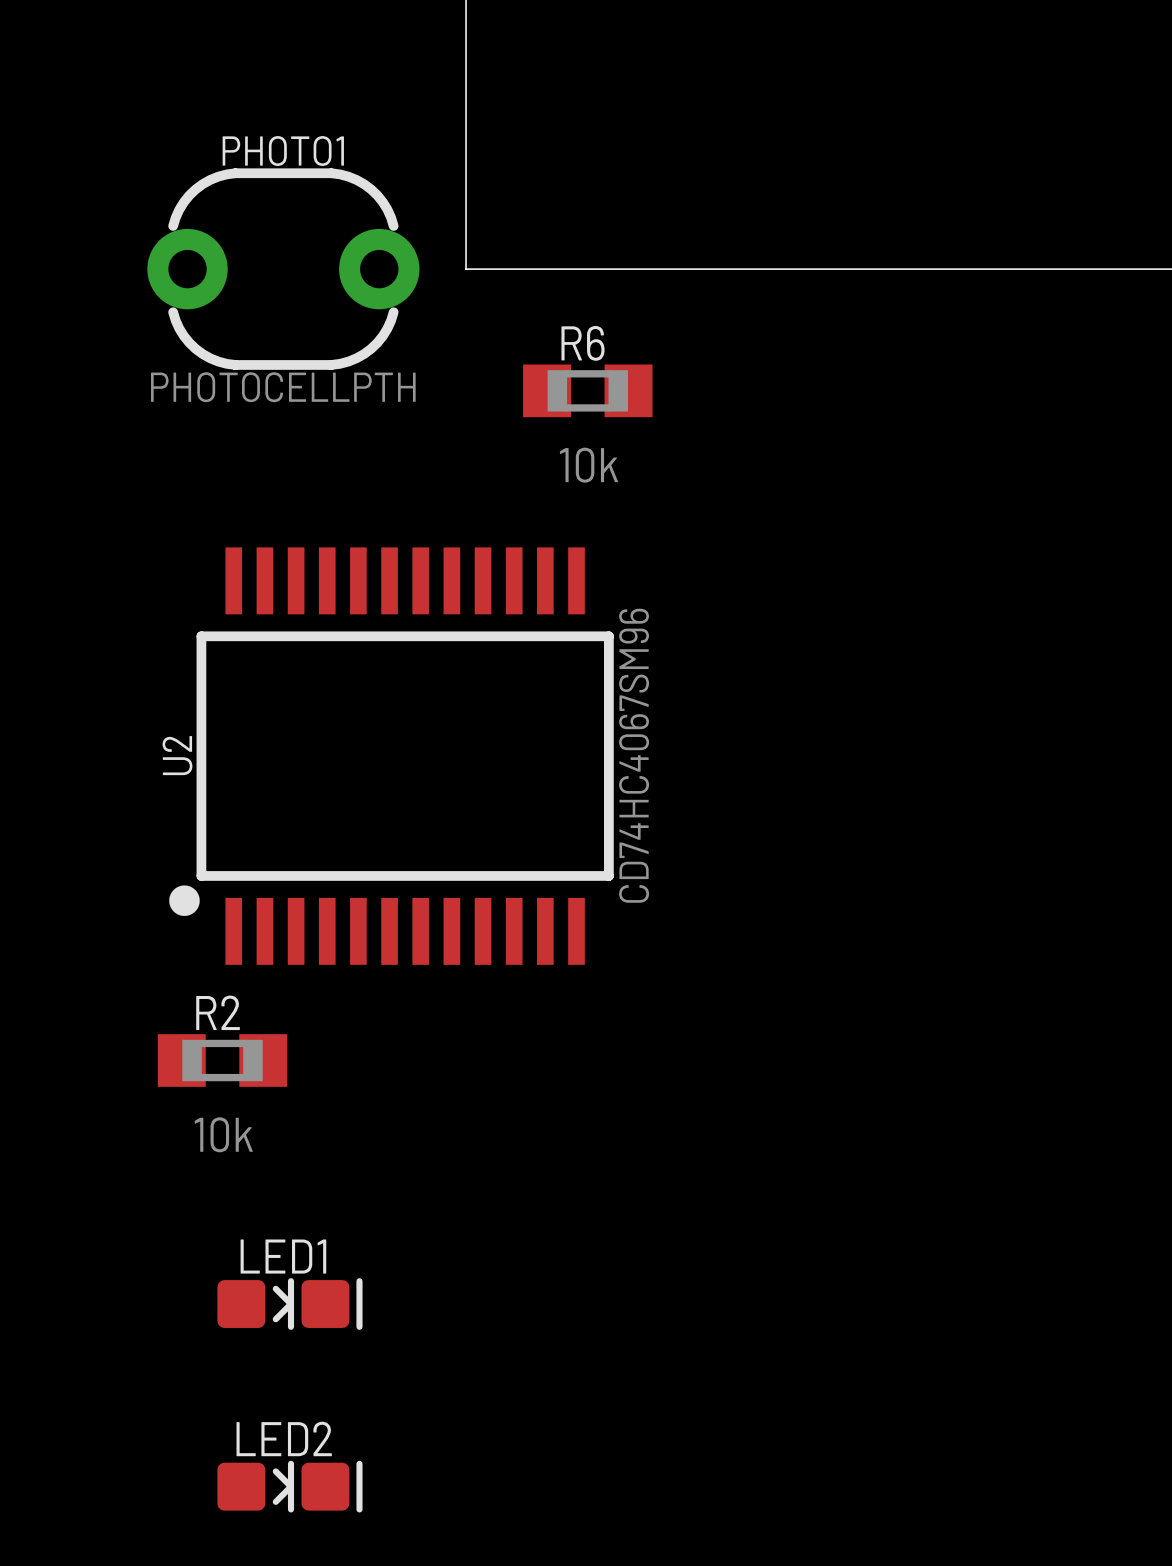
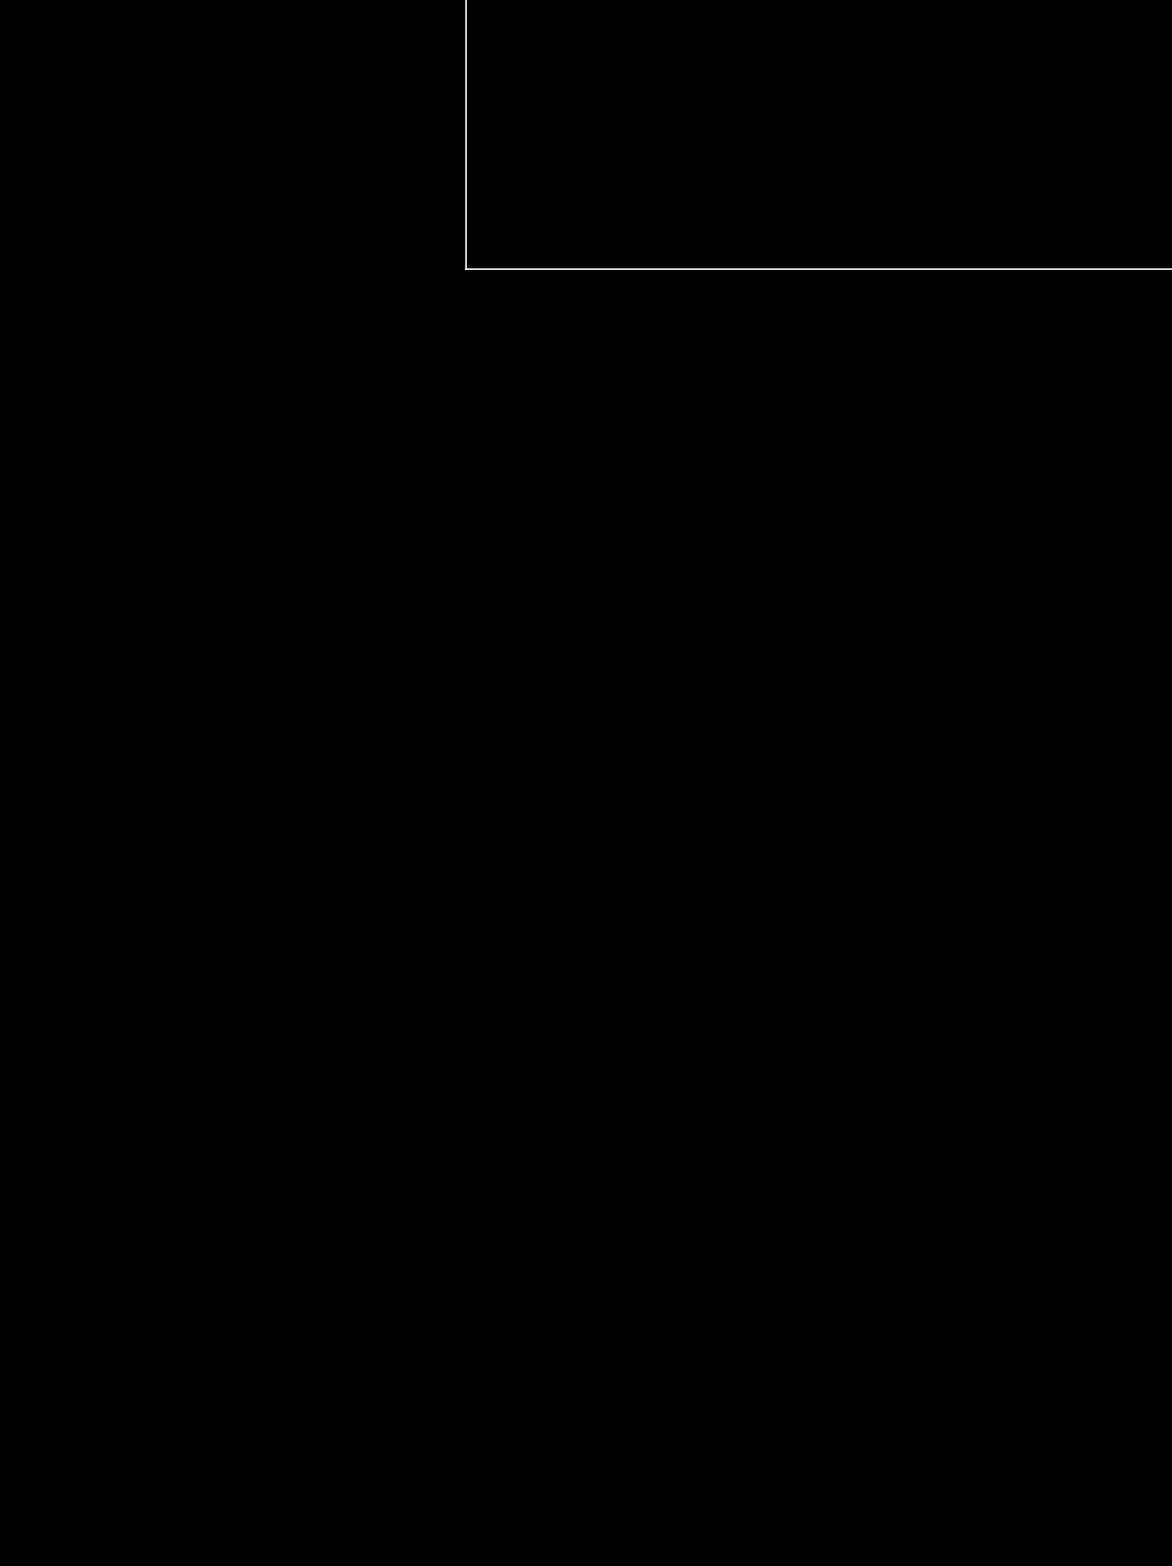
PHOTO1: PHOTOCELLPTH (283, 269) -> none
R6: 10k (587, 390) -> none
U2: CD74HC4067SM96 (391, 756) -> none
R2: 10k (222, 1060) -> none
LED1: (289, 1304) -> none
LED2: (289, 1486) -> none

